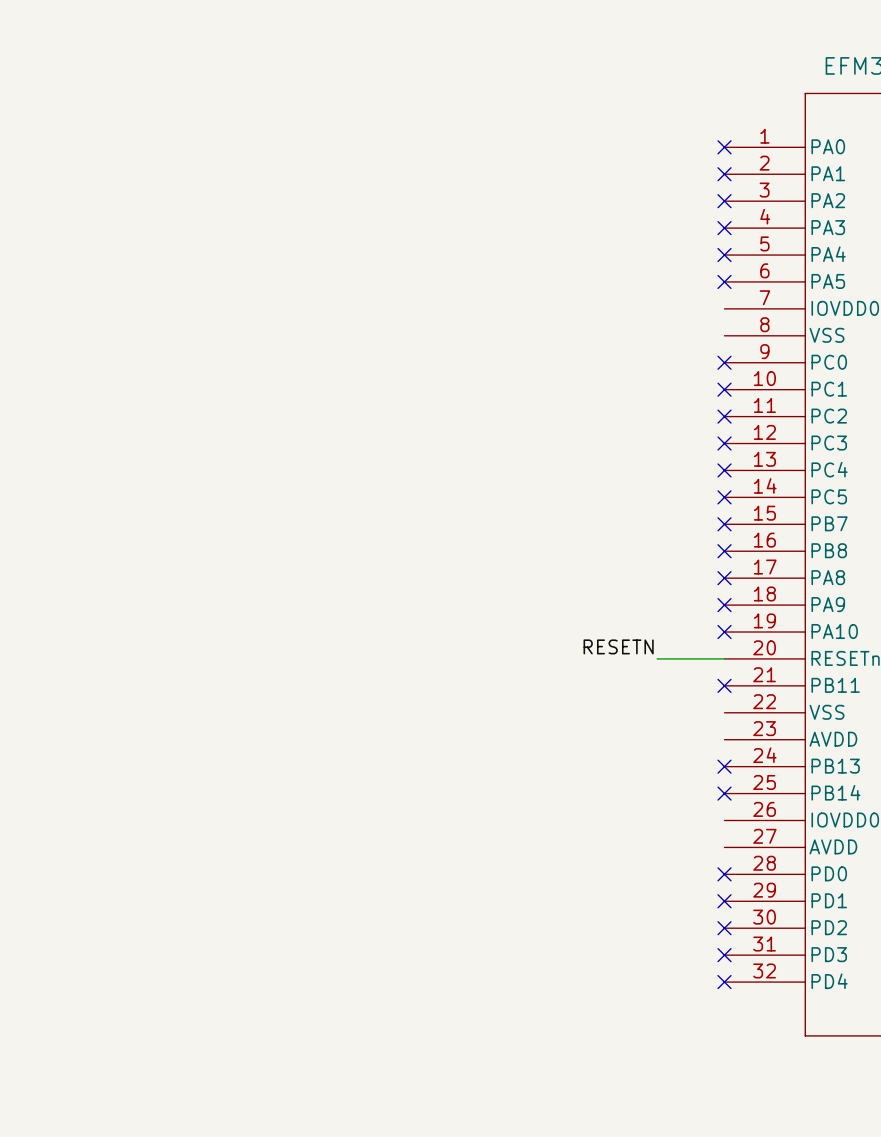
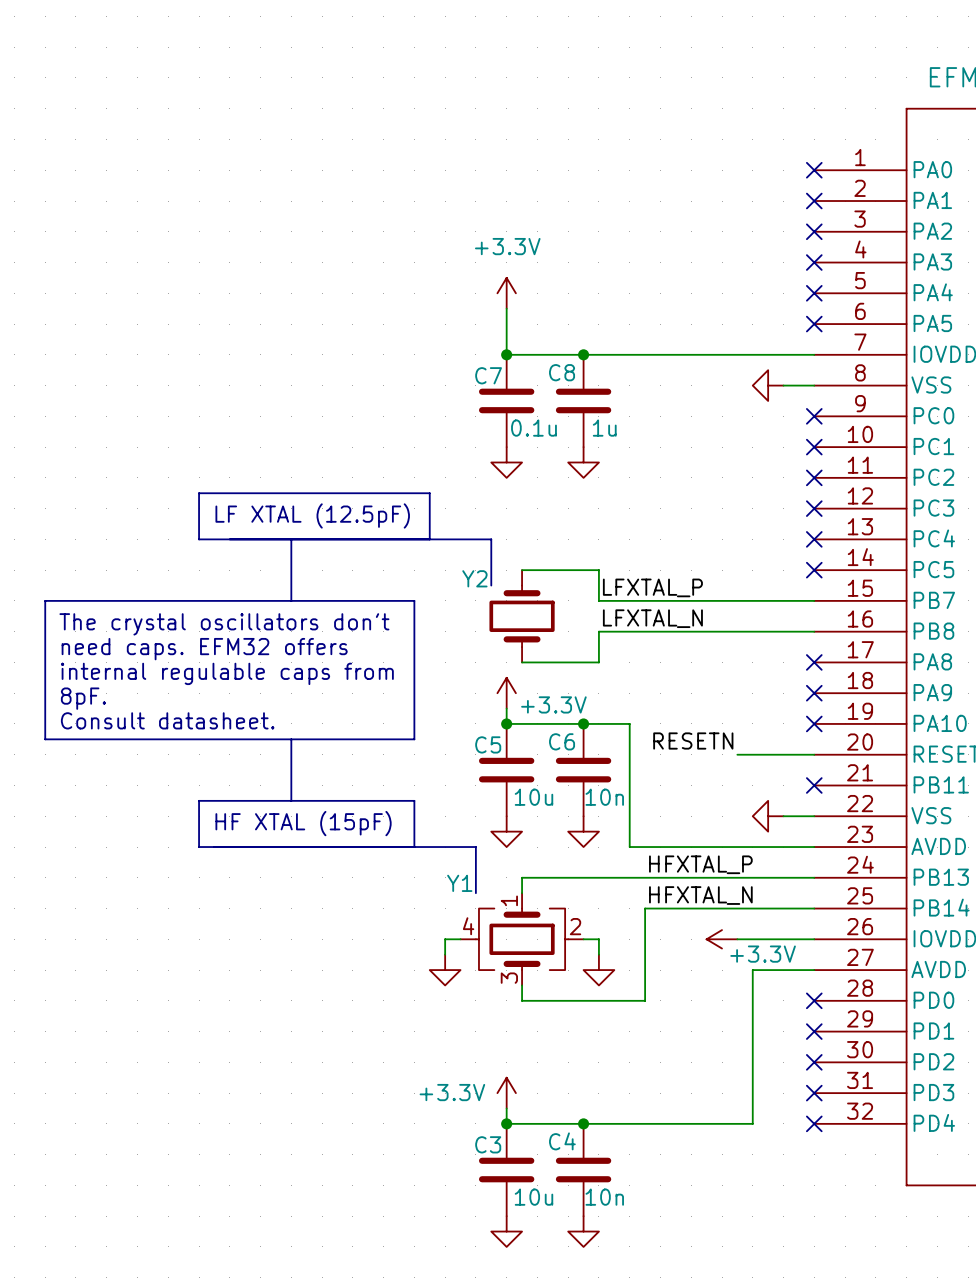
power symbol: none -> +3.3V (506, 293)
wire: none -> (506, 308) (506, 354) (814, 354)
junction: none -> (506, 354)
junction: none -> (583, 354)
power symbol: none -> (768, 385)
wire: none -> (783, 385) (814, 385)
C7: none -> 0.1u (506, 400)
C8: none -> 1u (583, 400)
power symbol: none -> (506, 462)
power symbol: none -> (583, 462)
text: none -> LF XTAL (12.5pF) (312, 515)
line: none -> (291, 539) (291, 600)
line: none -> (429, 539) (429, 493) (199, 493) (199, 539) (491, 539) (491, 585)
wire: none -> (522, 570) (598, 570) (598, 600) (814, 600)
label: none -> LFXTAL_P (652, 587)
line: none -> (45, 600) (414, 600) (414, 739) (45, 739) (45, 600)
no-connect mark: (724, 524) -> none
Y2: none -> (522, 616)
label: none -> LFXTAL_N (652, 618)
text: none -> The crystal oscillators don't (224, 624)
wire: none -> (814, 631) (598, 631) (598, 662) (522, 662)
no-connect mark: (724, 551) -> none
text: none -> need caps. EFM32 offers (204, 649)
text: none -> internal regulable caps from (227, 673)
power symbol: none -> +3.3V (506, 693)
text: none -> 8pF. (83, 698)
wire: none -> (506, 708) (506, 723) (629, 723) (629, 847) (814, 847)
text: none -> Consult datasheet. (167, 720)
junction: none -> (506, 723)
junction: none -> (583, 723)
line: none -> (291, 739) (291, 800)
C5: none -> 10u (506, 770)
C6: none -> 10n (583, 770)
power symbol: none -> (768, 816)
wire: none -> (783, 816) (814, 816)
text: none -> HF XTAL (15pF) (303, 823)
power symbol: none -> (506, 831)
power symbol: none -> (583, 831)
line: none -> (414, 847) (414, 800) (199, 800) (199, 847) (475, 847) (475, 893)
label: none -> HFXTAL_P (700, 864)
wire: none -> (814, 877) (522, 877) (522, 893)
no-connect mark: (724, 766) -> none
label: none -> HFXTAL_N (700, 895)
wire: none -> (814, 908) (645, 908) (645, 1000) (522, 1000) (522, 985)
no-connect mark: (724, 793) -> none
wire: none -> (460, 939) (445, 939) (445, 954)
Y1: none -> (522, 939)
wire: none -> (583, 939) (598, 939) (598, 954)
power symbol: none -> +3.3V (722, 939)
wire: none -> (737, 939) (814, 939)
power symbol: none -> (445, 970)
power symbol: none -> (598, 970)
wire: none -> (814, 970) (752, 970) (752, 1123) (506, 1123) (506, 1108)
power symbol: none -> +3.3V (506, 1093)
junction: none -> (506, 1123)
junction: none -> (583, 1123)
C3: none -> 10u (506, 1170)
C4: none -> 10n (583, 1170)
power symbol: none -> (506, 1231)
power symbol: none -> (583, 1231)

